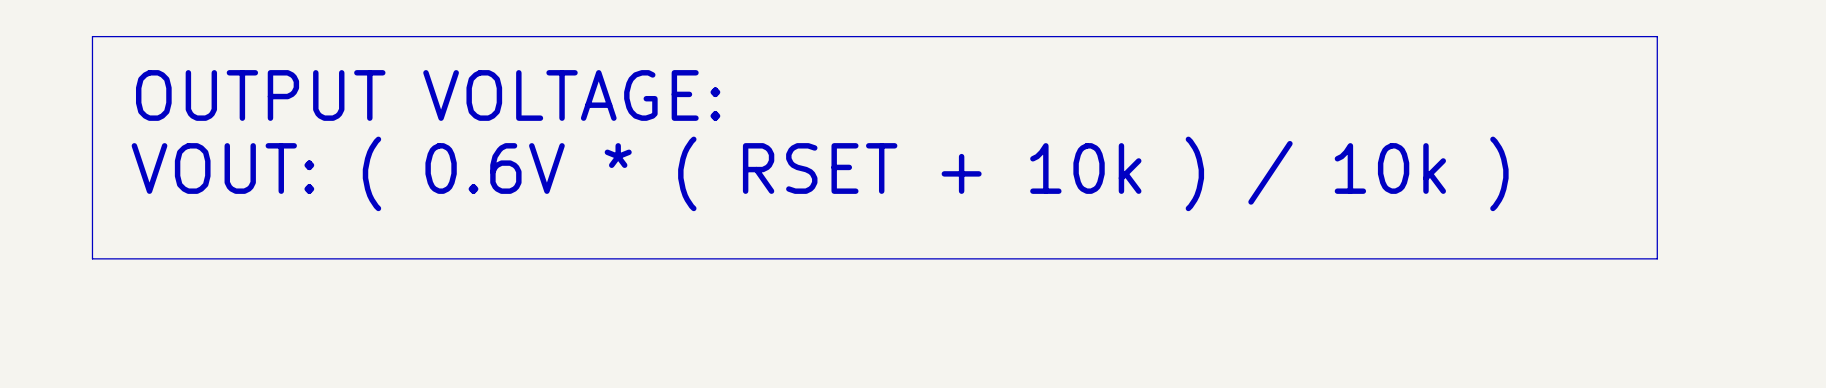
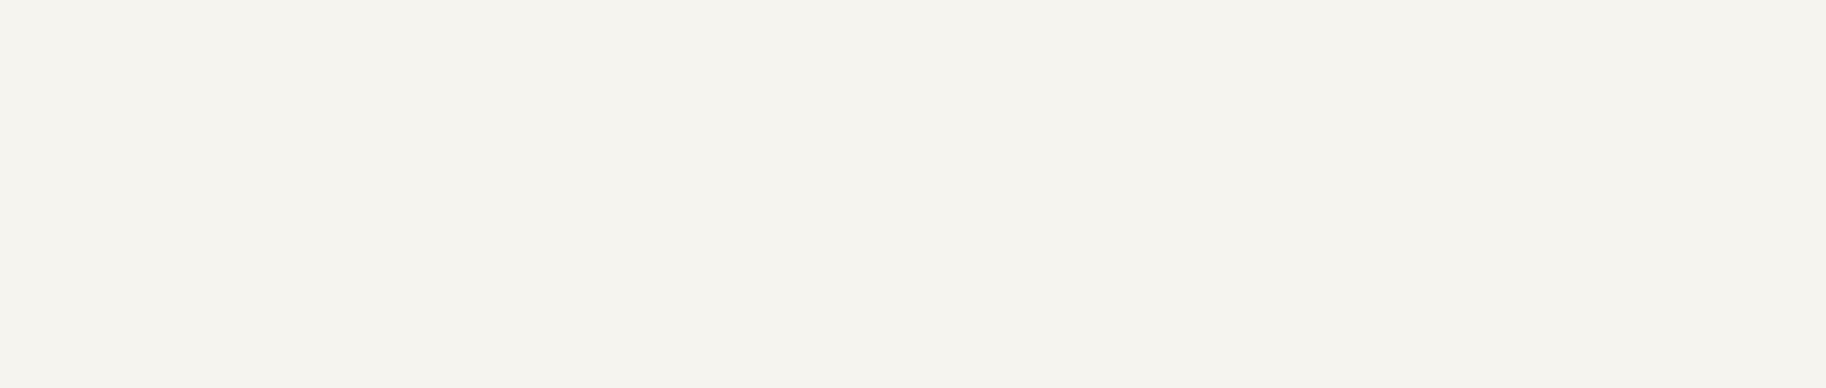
line: (92, 36) (1657, 36) (1657, 258) (92, 258) (92, 36) -> none
text: OUTPUT VOLTAGE: (428, 95) -> none
text: VOUT: ( 0.6V * ( RSET + 10k ) / 10k ) (820, 173) -> none

